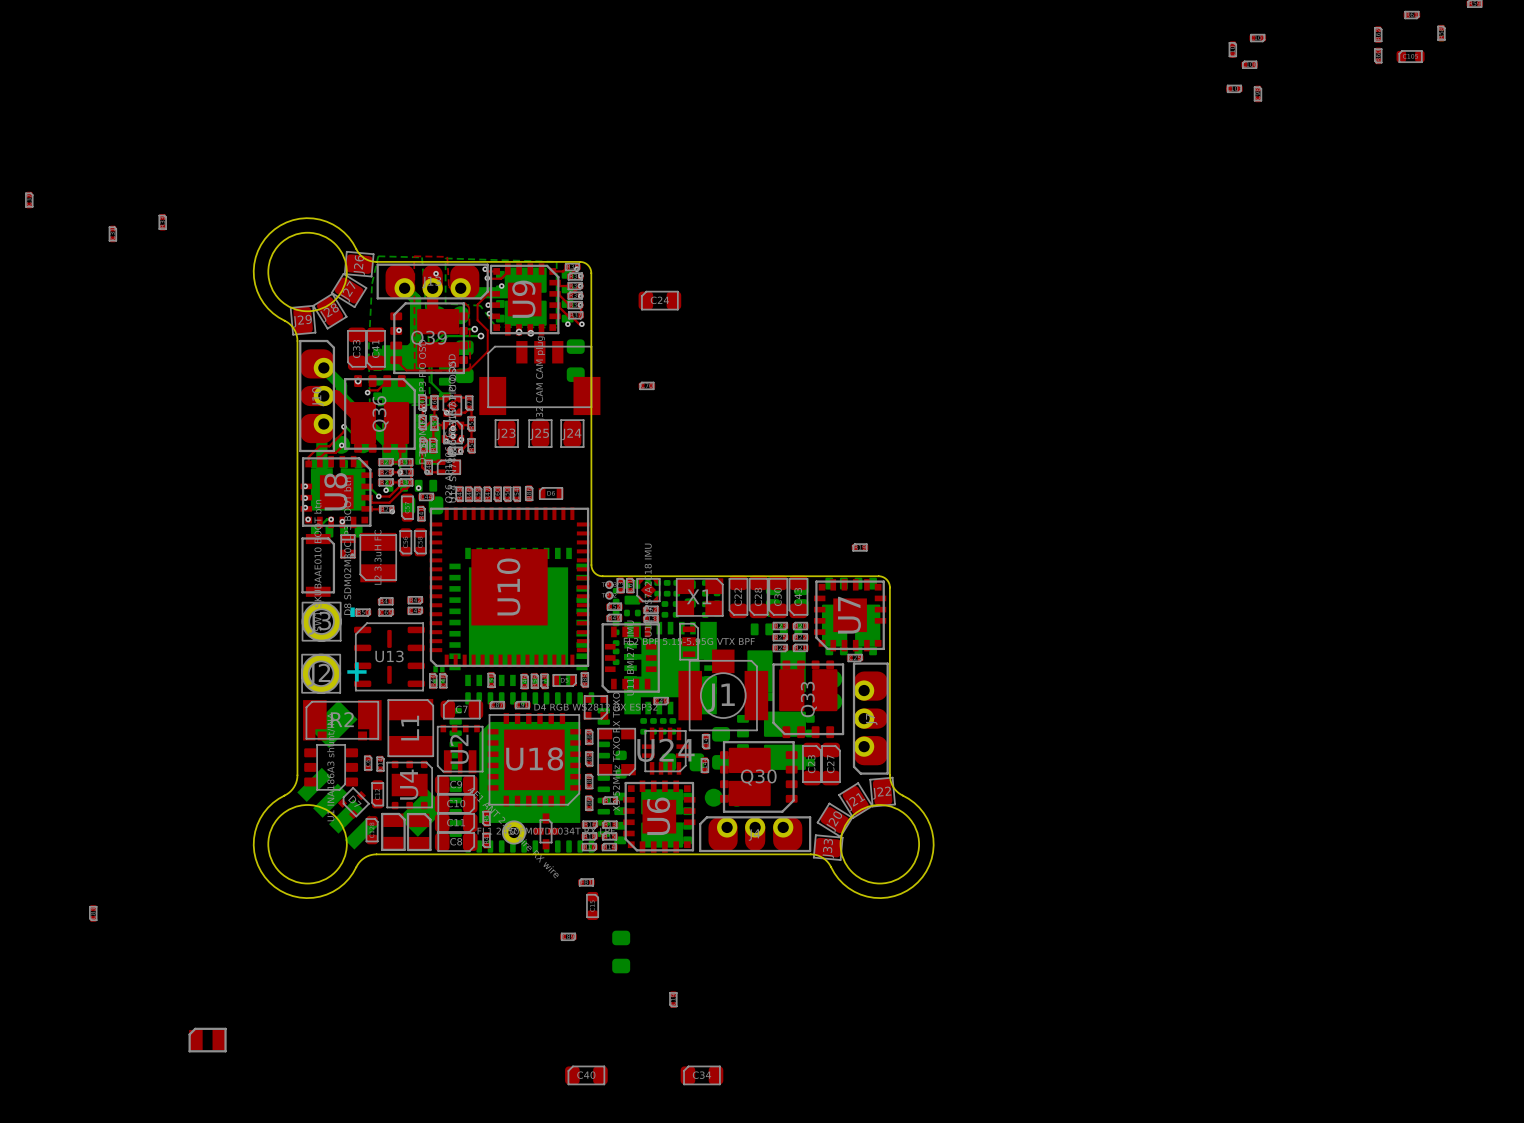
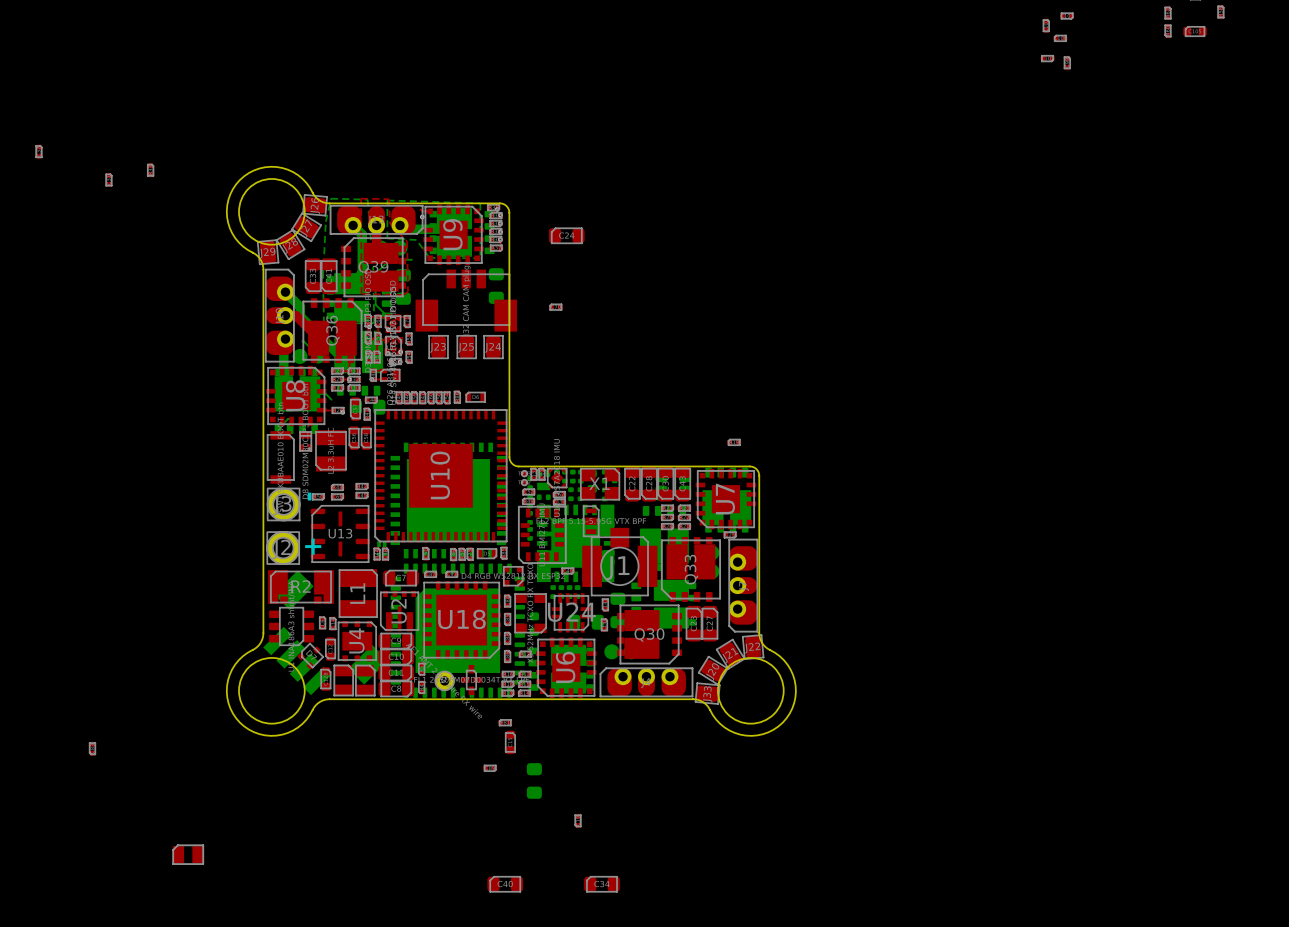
top track: (567, 267) (563, 271) (552, 271) -> none
via: (485, 269) -> none
top track: (507, 269) (507, 272) (501, 278) (487, 278) -> none
via: (436, 273) -> none
top track: (555, 282) (558, 286) (569, 286) -> none
via: (501, 286) -> none
top track: (555, 293) (558, 293) (569, 305) -> none
top track: (490, 294) (487, 294) (477, 304) (477, 320) (487, 330) (487, 351) (468, 370) (406, 370) (396, 360) -> none
via: (488, 305) -> none
top track: (555, 305) (579, 324) (581, 324) -> none
via: (489, 313) -> none
via: (567, 324) -> none
via: (581, 324) -> none
via: (474, 329) -> none
via: (399, 330) -> none
via: (519, 332) -> none
via: (530, 333) -> none
bottom track: (480, 336) (447, 336) (435, 347) (435, 358) (444, 367) -> none
via: (480, 336) -> none
via: (358, 381) -> none
top track: (387, 381) (377, 390) (369, 390) (367, 392) -> none
via: (367, 392) -> none
top track: (457, 412) (465, 412) (469, 408) (471, 410) (471, 418) -> none
top track: (460, 425) (467, 425) (471, 429) (471, 440) (460, 450) -> none
top track: (343, 426) (343, 431) (329, 446) (319, 446) (308, 457) (308, 463) -> none
via: (343, 426) -> none
via: (452, 428) -> none
via: (452, 436) -> none
via: (341, 445) -> none
top track: (342, 445) (335, 452) (325, 452) (319, 458) (319, 461) -> none
top track: (433, 450) (422, 452) (422, 467) (428, 472) -> none
top track: (411, 462) (411, 484) (406, 488) (403, 488) (389, 502) (372, 502) (367, 497) -> none
top track: (391, 482) (400, 482) (400, 485) (389, 496) (378, 496) -> none
via: (305, 486) -> none
via: (418, 488) -> none
via: (386, 490) -> none
via: (378, 496) -> none
via: (305, 498) -> none
via: (305, 507) -> none
via: (308, 519) -> none
via: (331, 519) -> none
via: (342, 521) -> none

